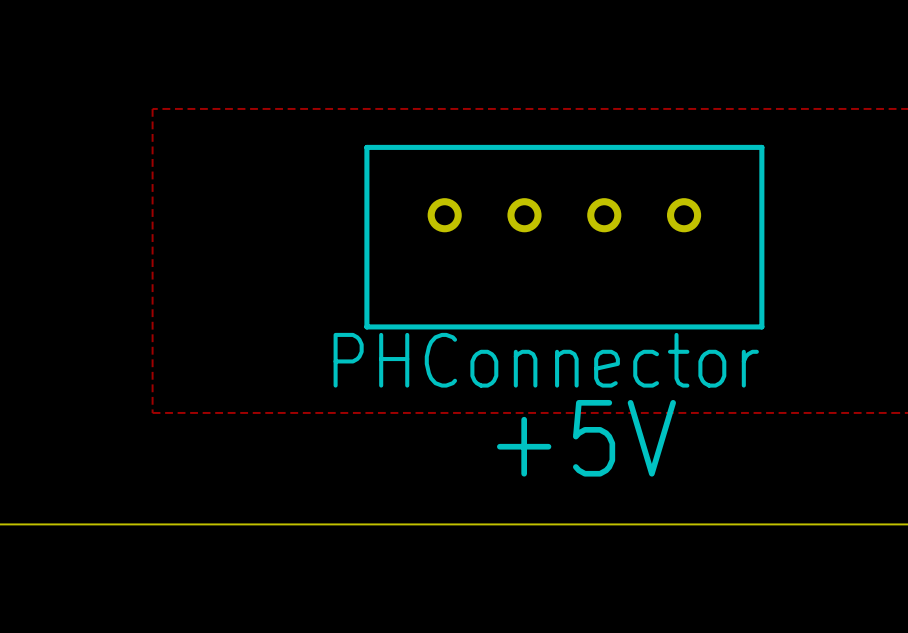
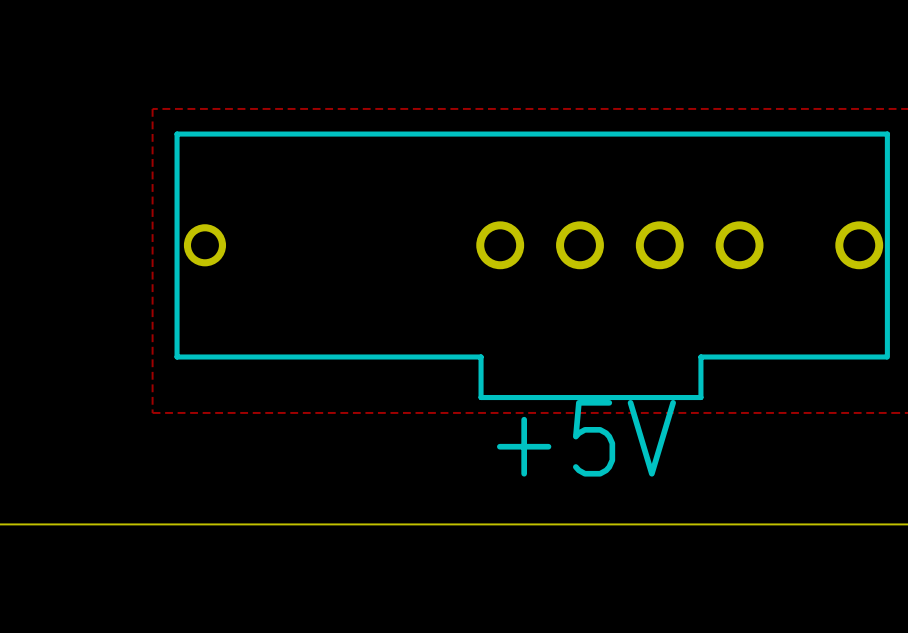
part: (564, 237) -> none
part: none -> (532, 265)

